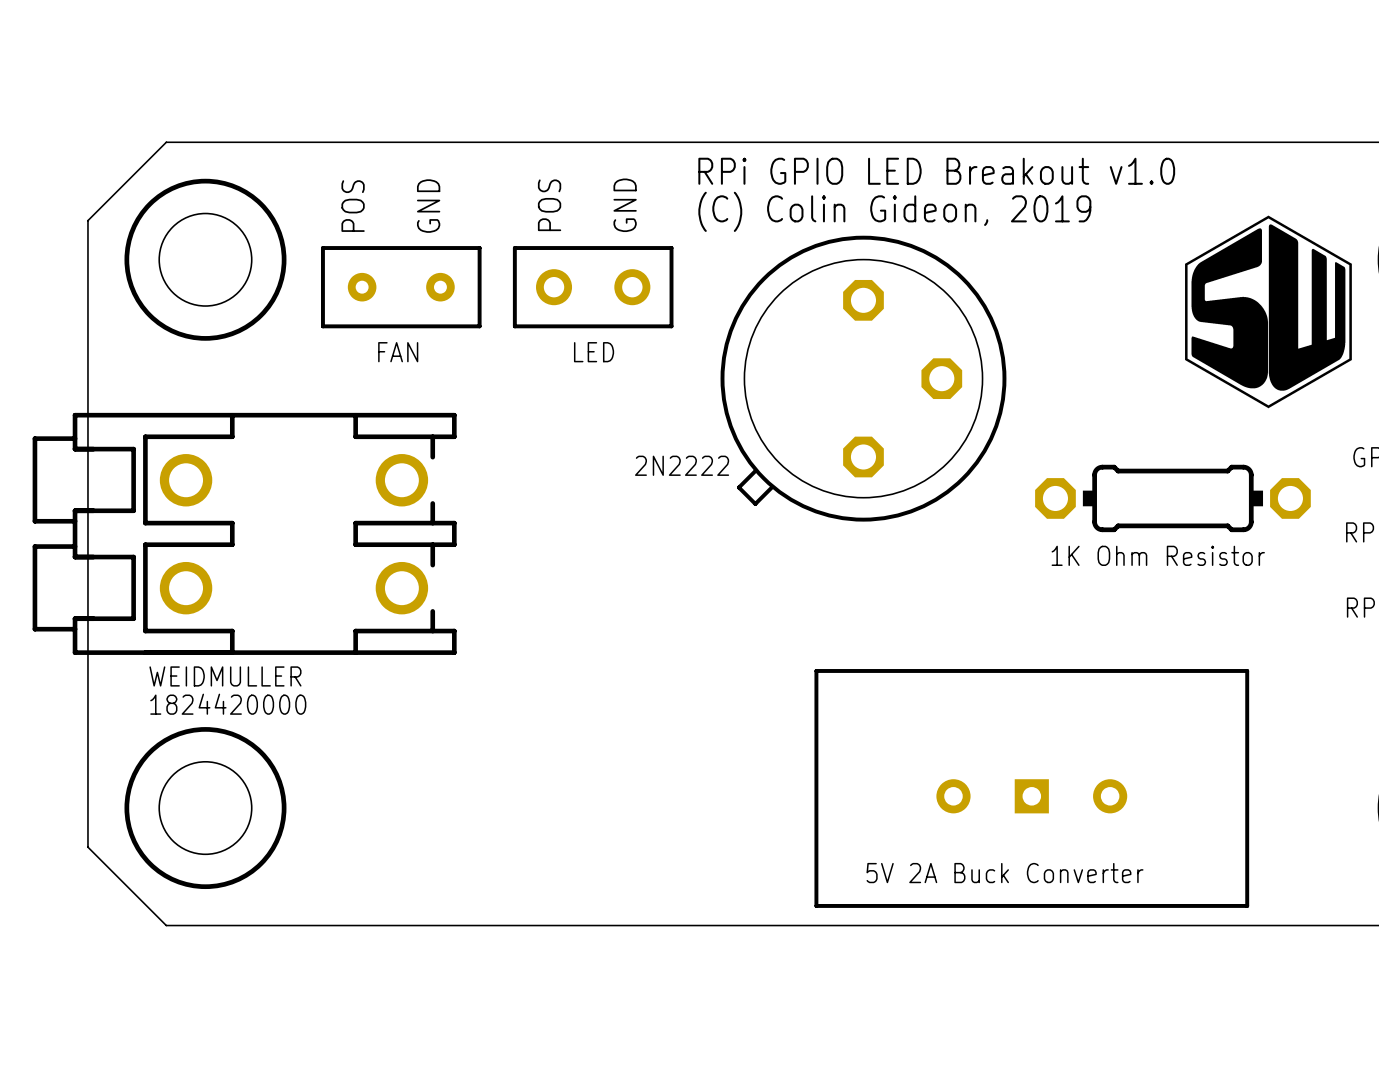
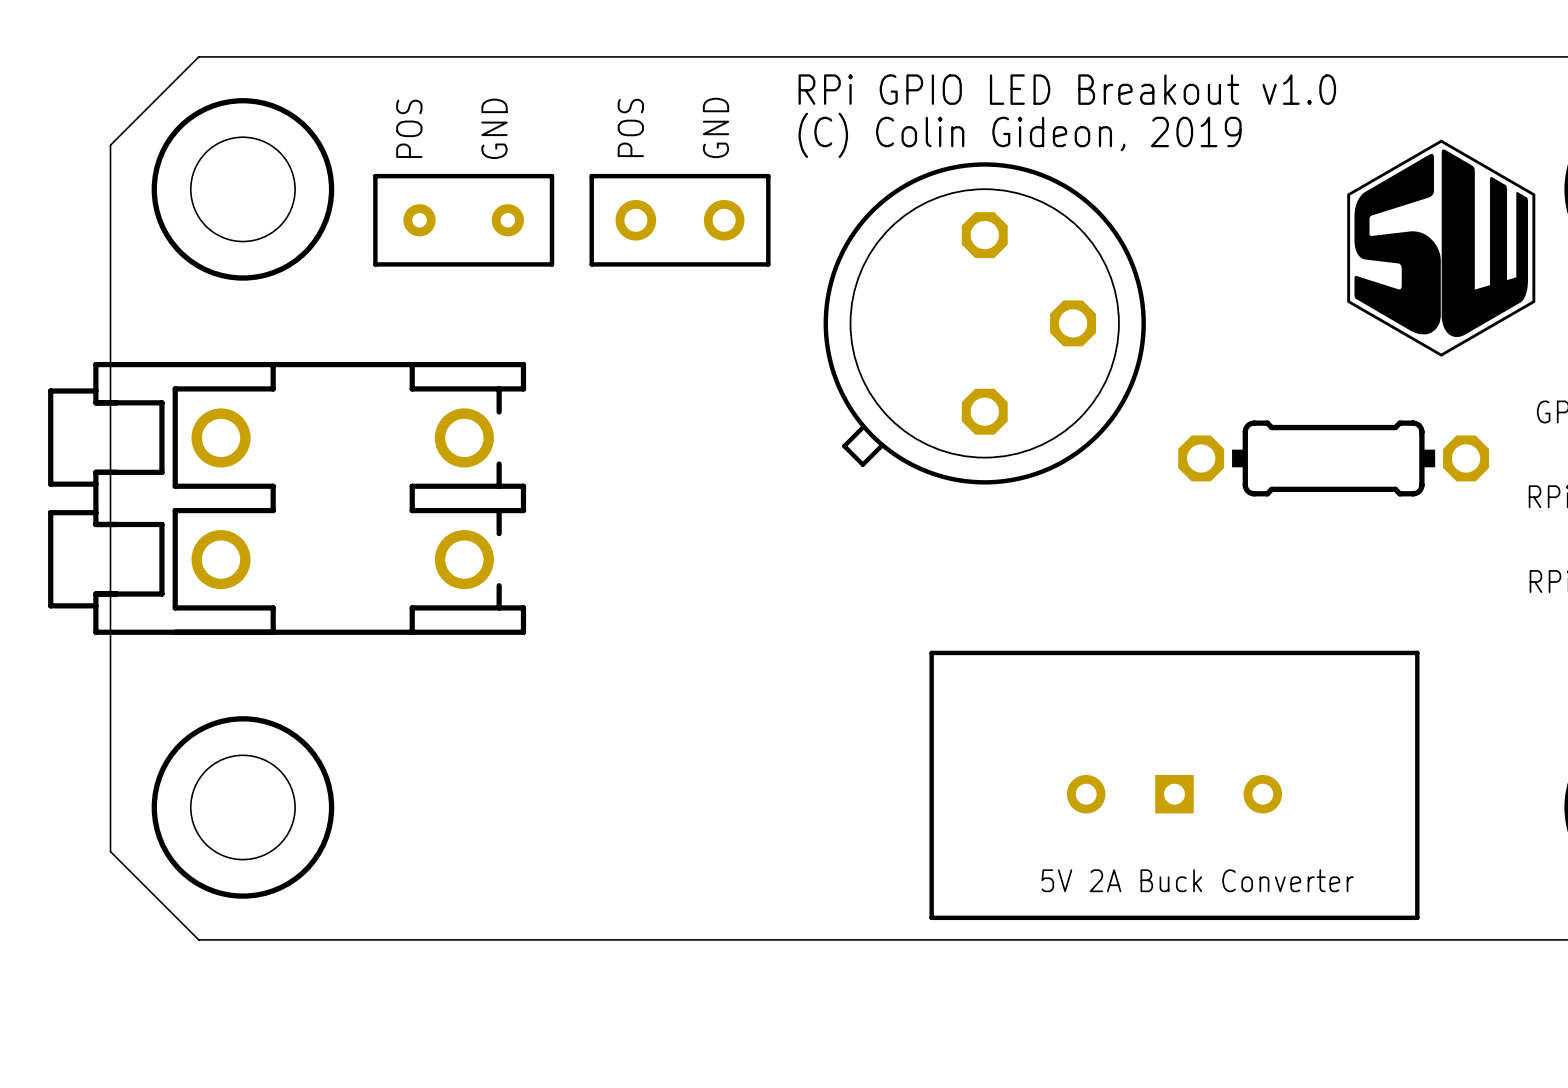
text: FAN (398, 352) -> none
text: LED (594, 352) -> none
text: 2N2222 (682, 465) -> none
text: 1K Ohm Resistor (1158, 555) -> none
text: WEIDMULLER (225, 676) -> none
text: 1824420000 (228, 704) -> none
text position: 5V 2A Buck Converter (1005, 873) -> 5V 2A Buck Converter (1197, 880)

